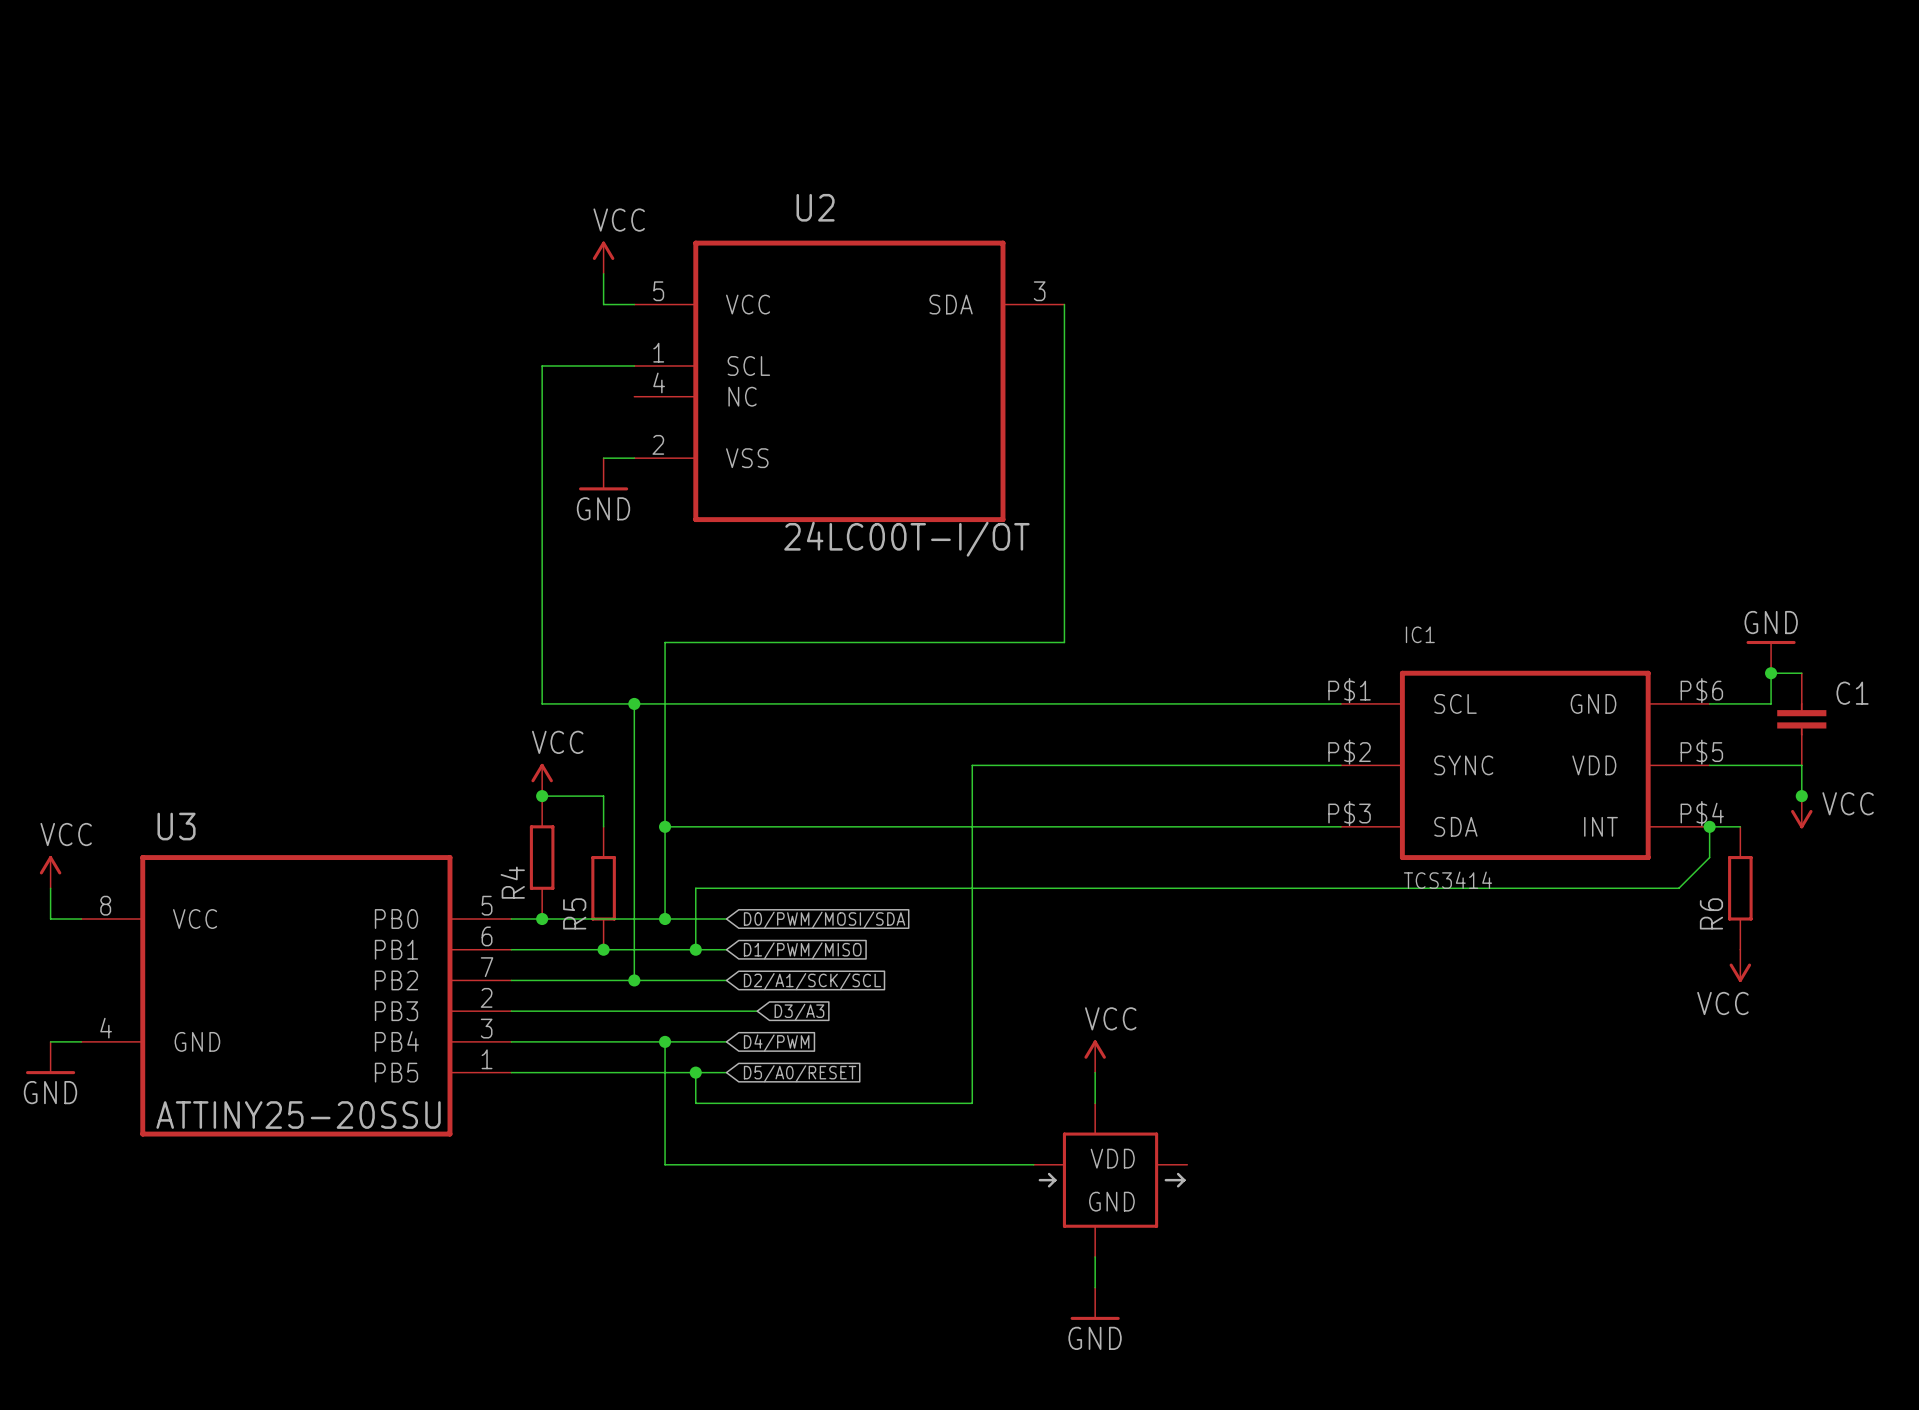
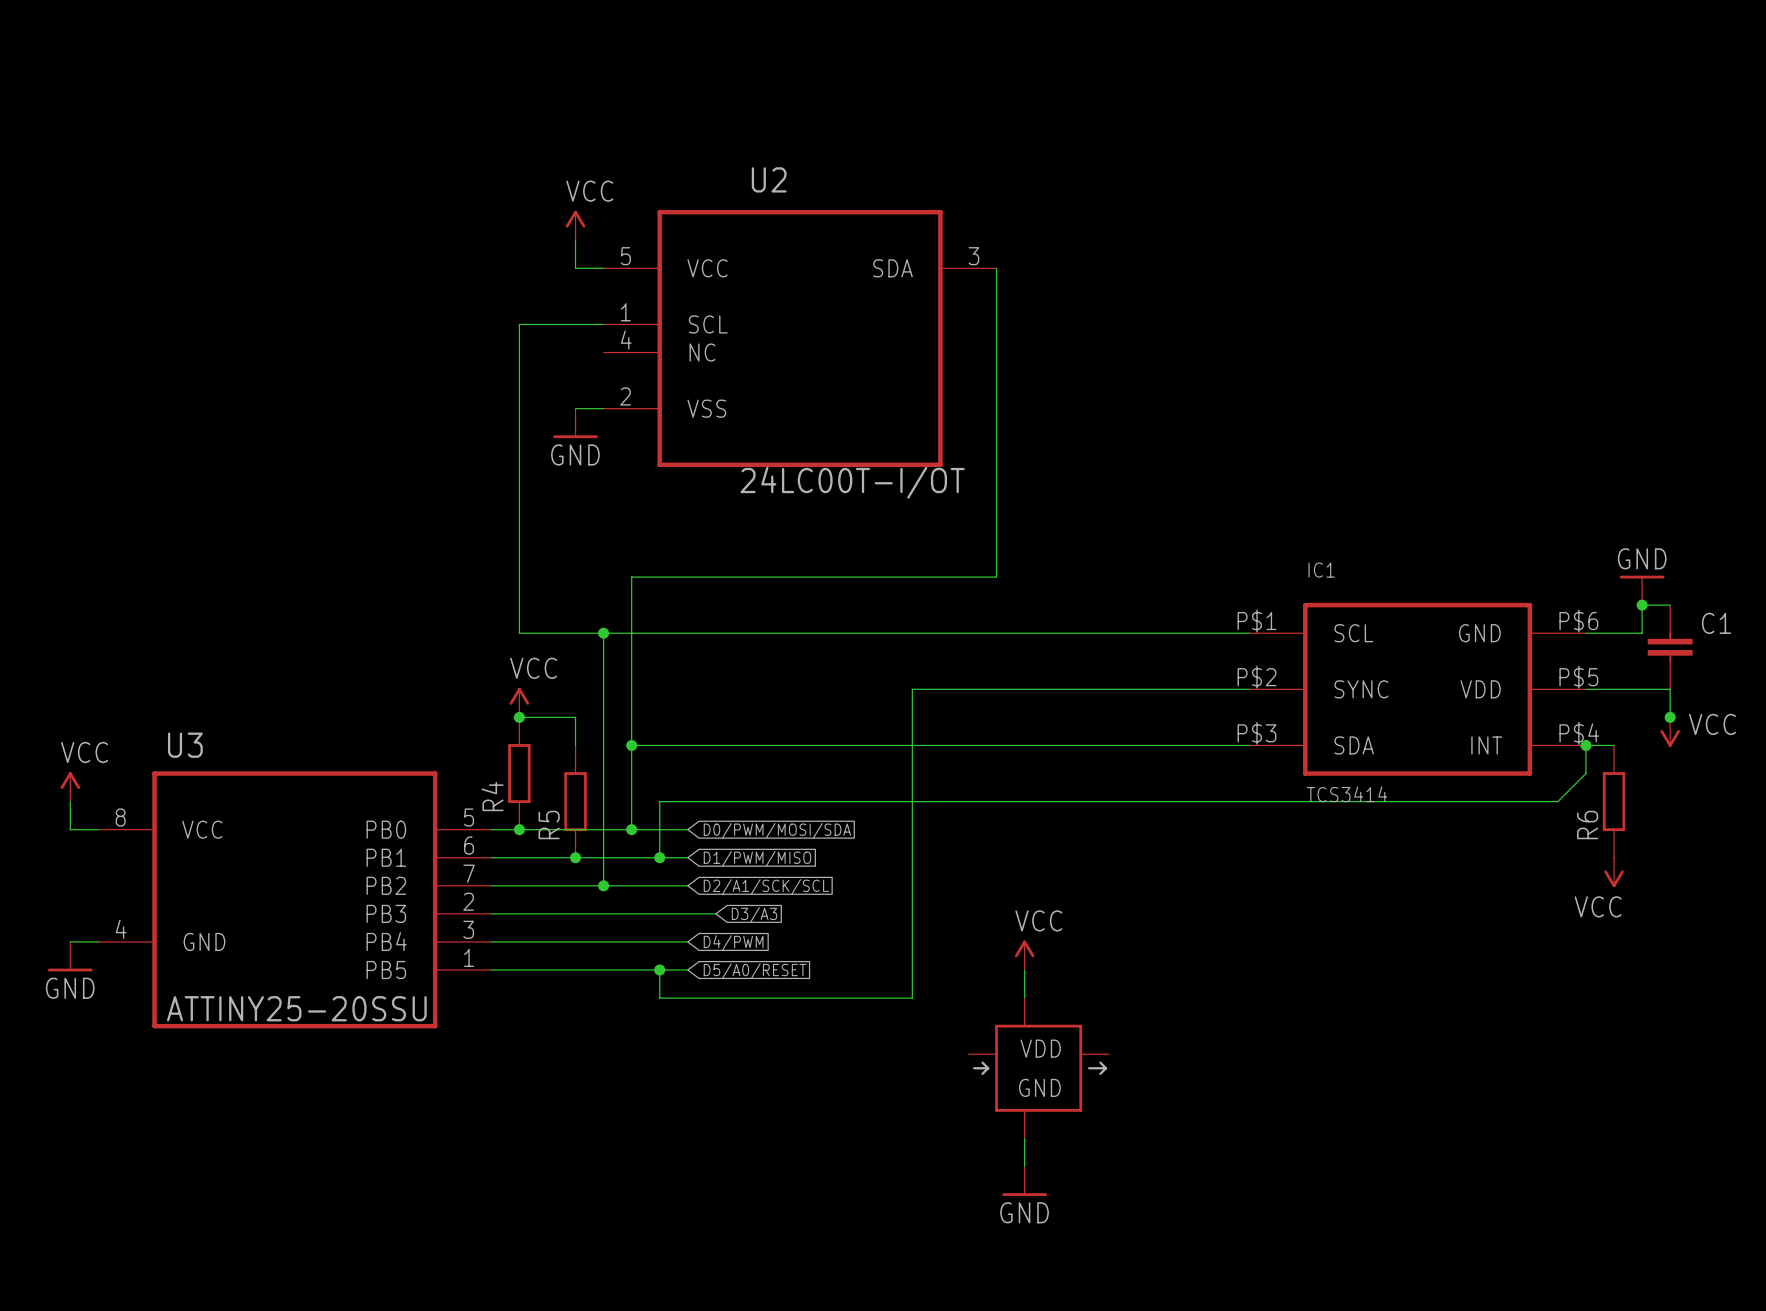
wire: (665, 1041) (665, 1164) (1033, 1164) -> none
junction: (665, 1041) -> none

